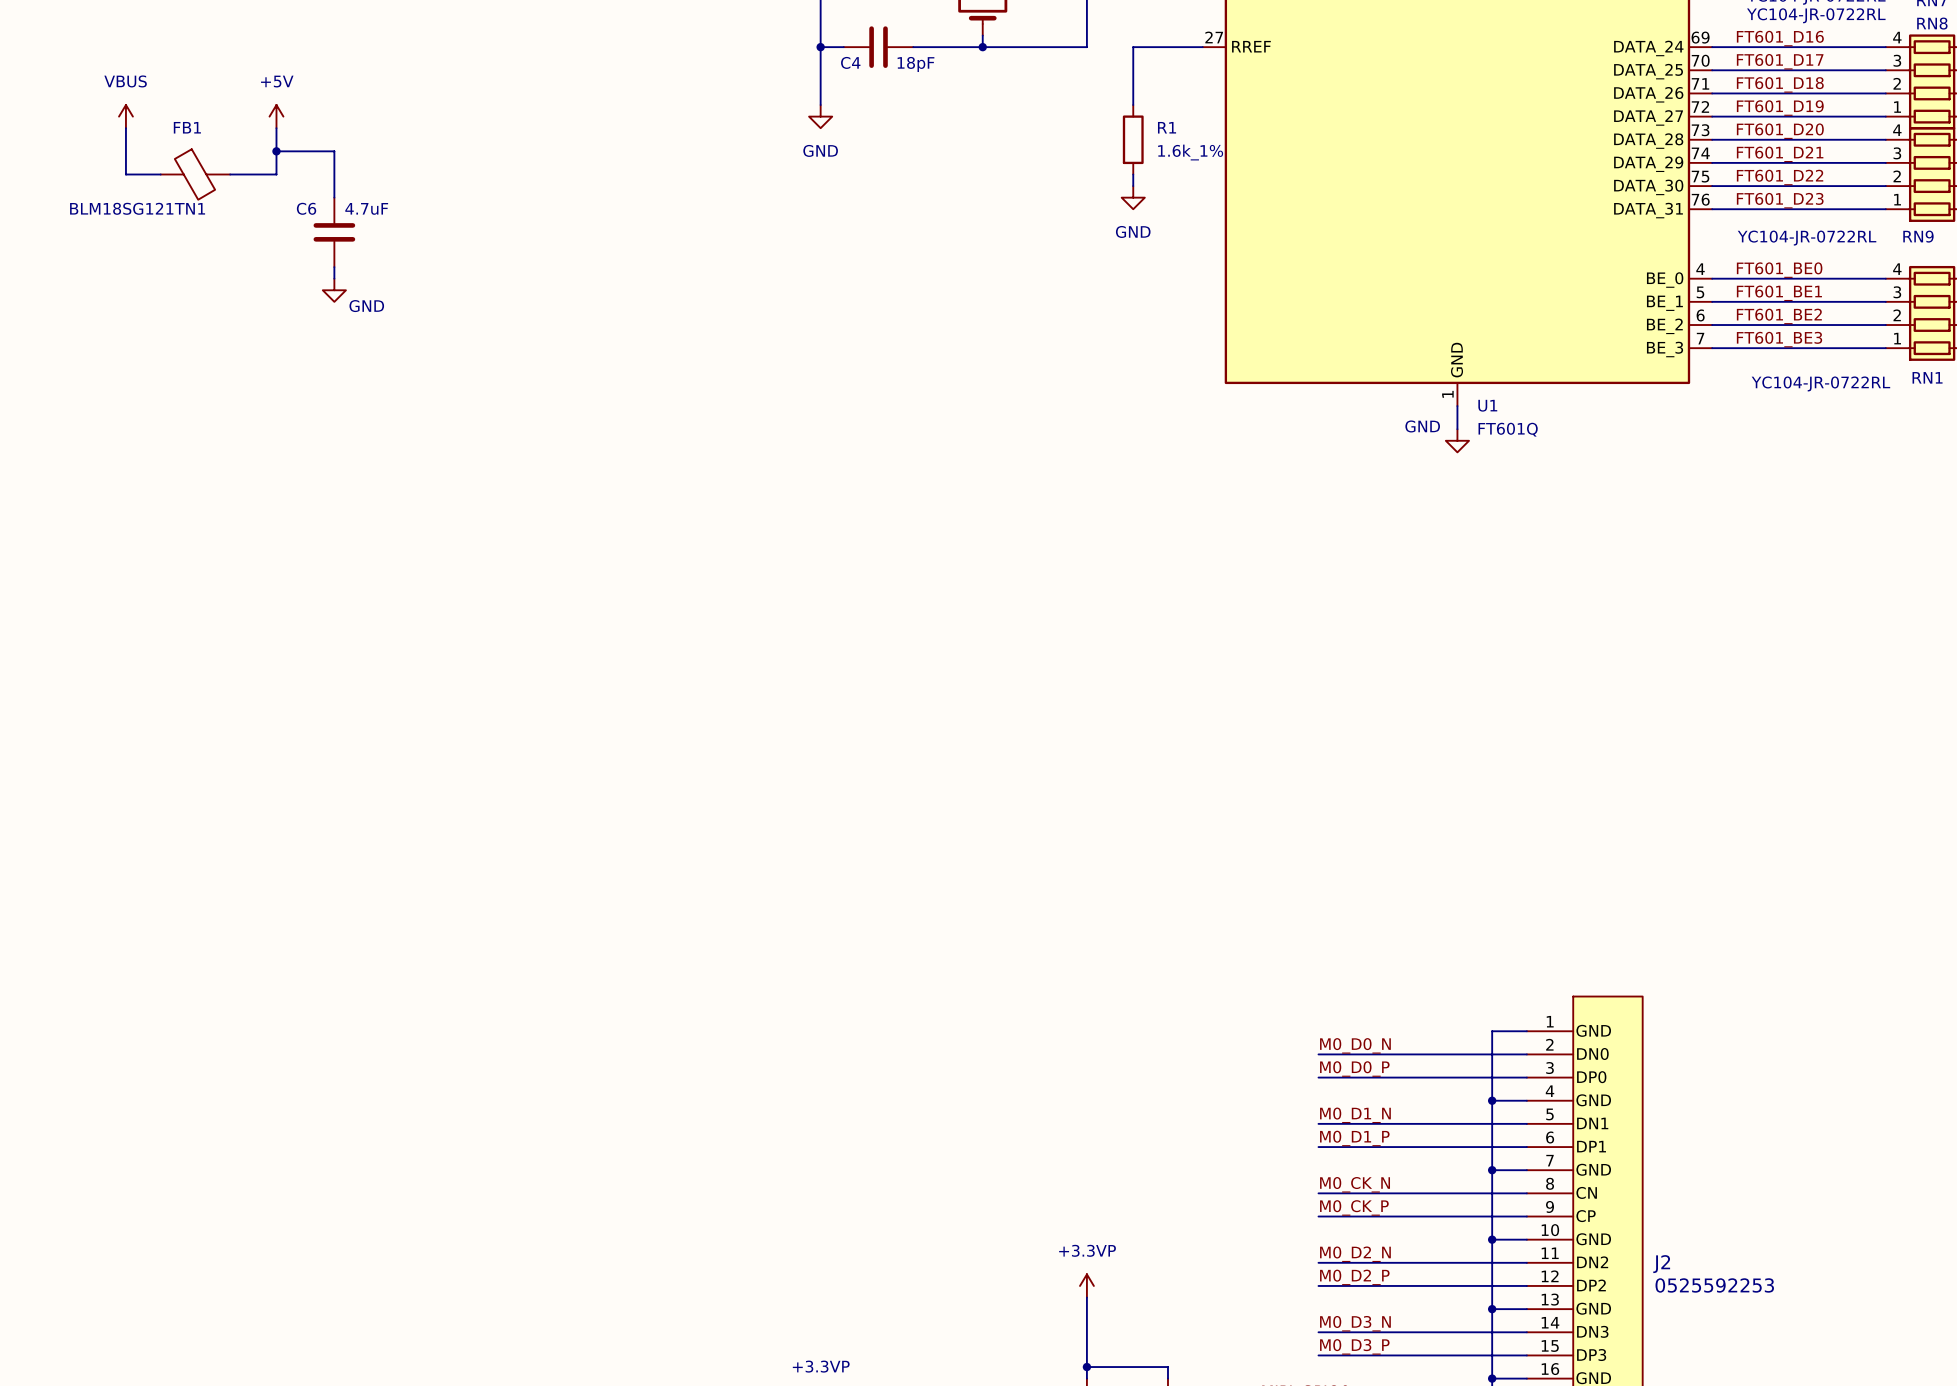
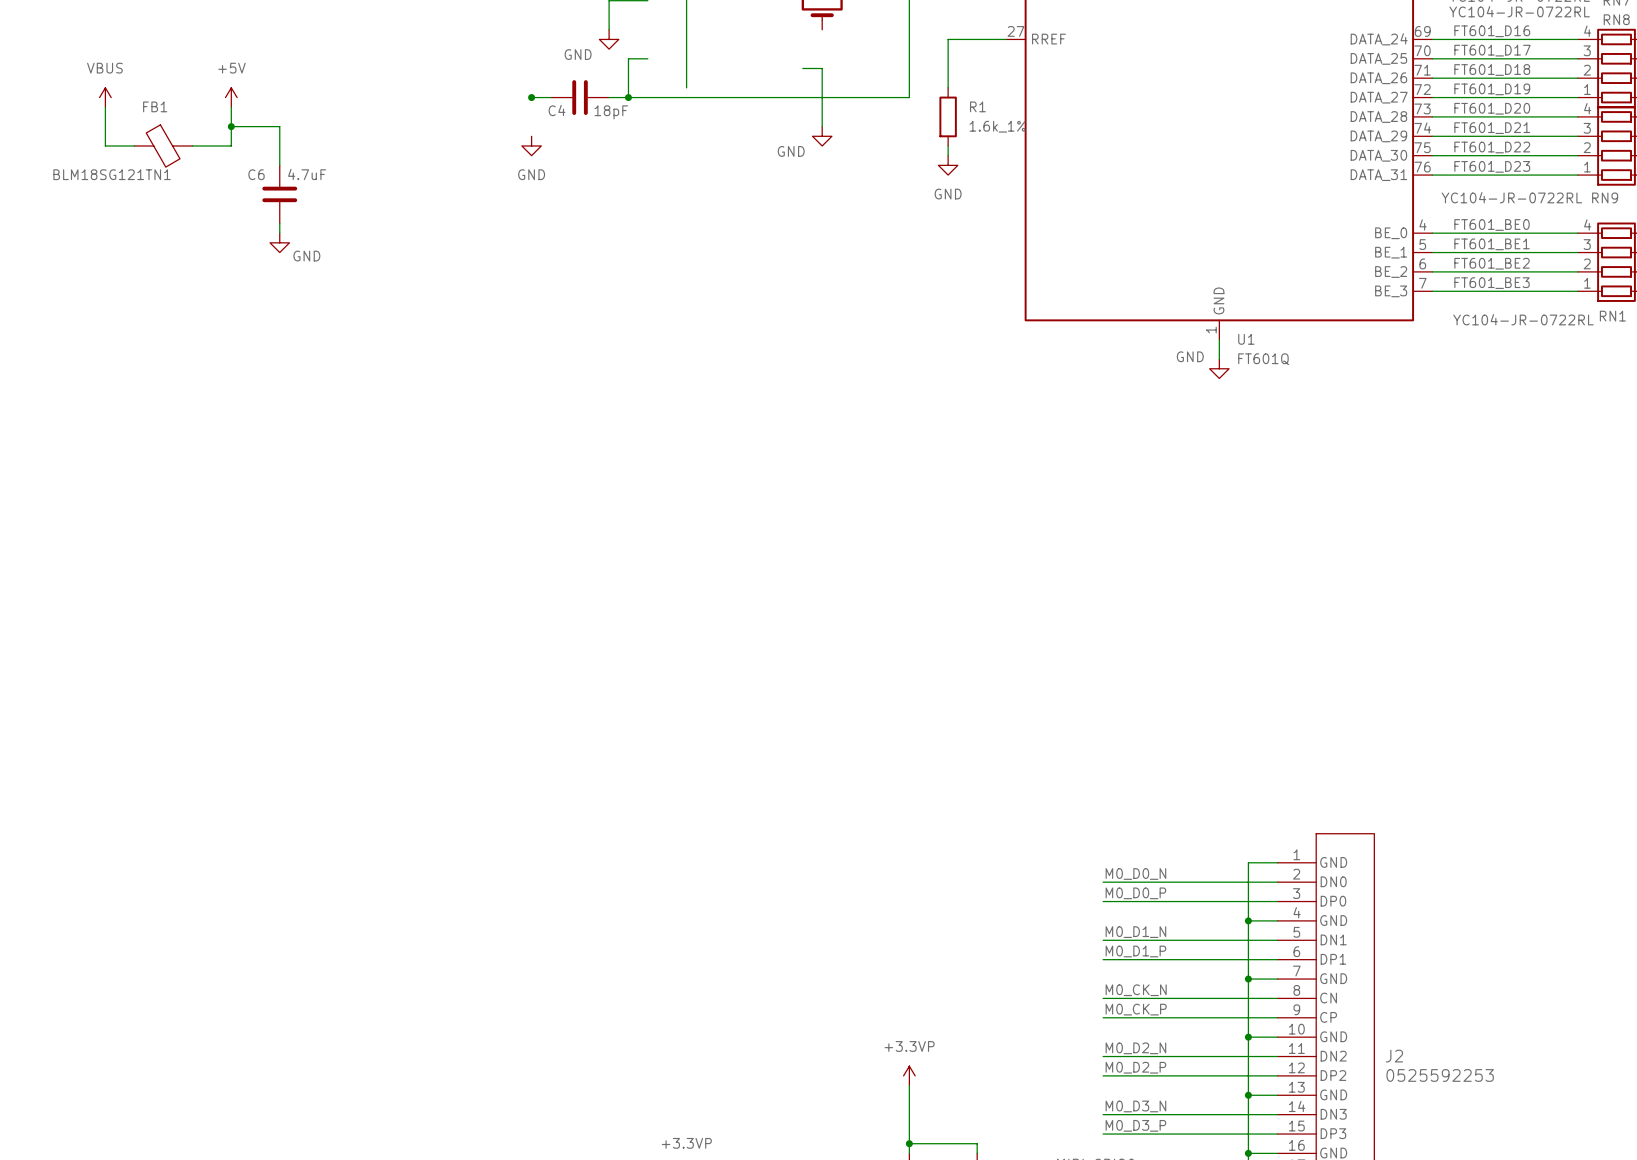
wire: none -> (647, 0) (609, 0) (609, 29)
wire: (982, 35) (982, 47) -> none
power symbol: none -> GND (609, 39)
wire: (820, 47) (843, 47) -> (531, 97) (550, 97)
junction: (820, 47) -> none
C4 position: (878, 47) -> (580, 97)
wire: (913, 47) (1086, 47) -> (609, 97) (909, 97) (909, 39)
junction: (982, 47) -> none
wire: none -> (647, 58) (628, 58) (628, 97)
wire: none -> (802, 68) (822, 68) (822, 126)
junction: none -> (531, 97)
junction: none -> (628, 97)
power symbol: GND (820, 116) -> none
power symbol: none -> GND (822, 136)
power symbol: none -> GND (531, 145)

